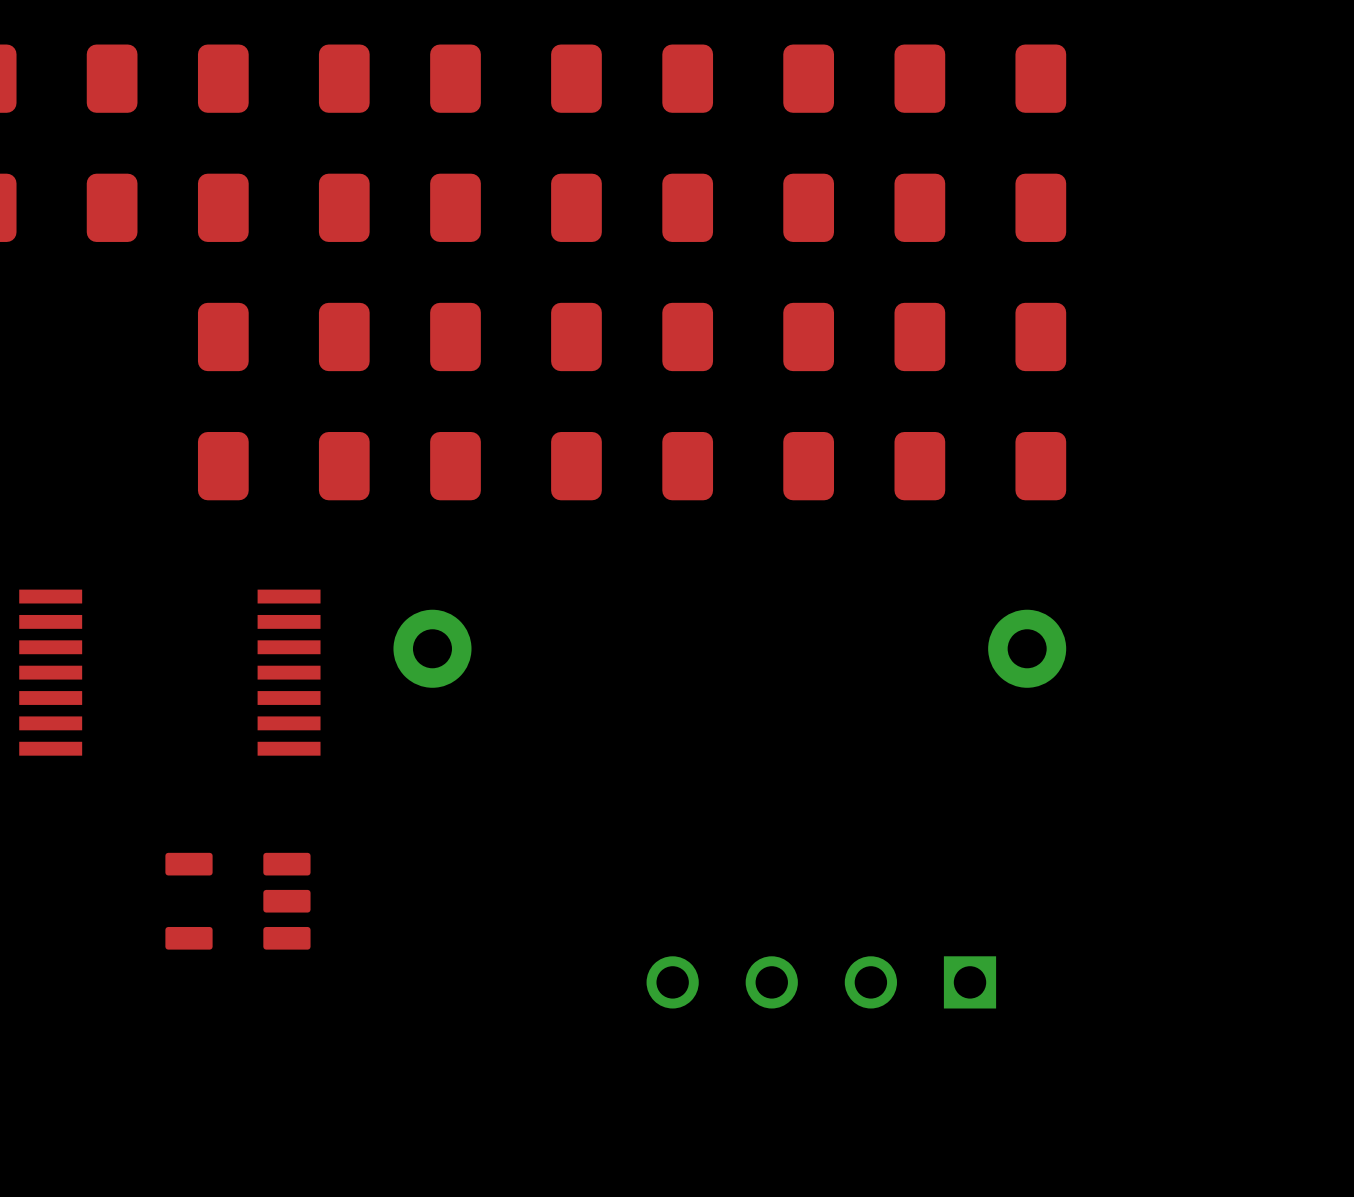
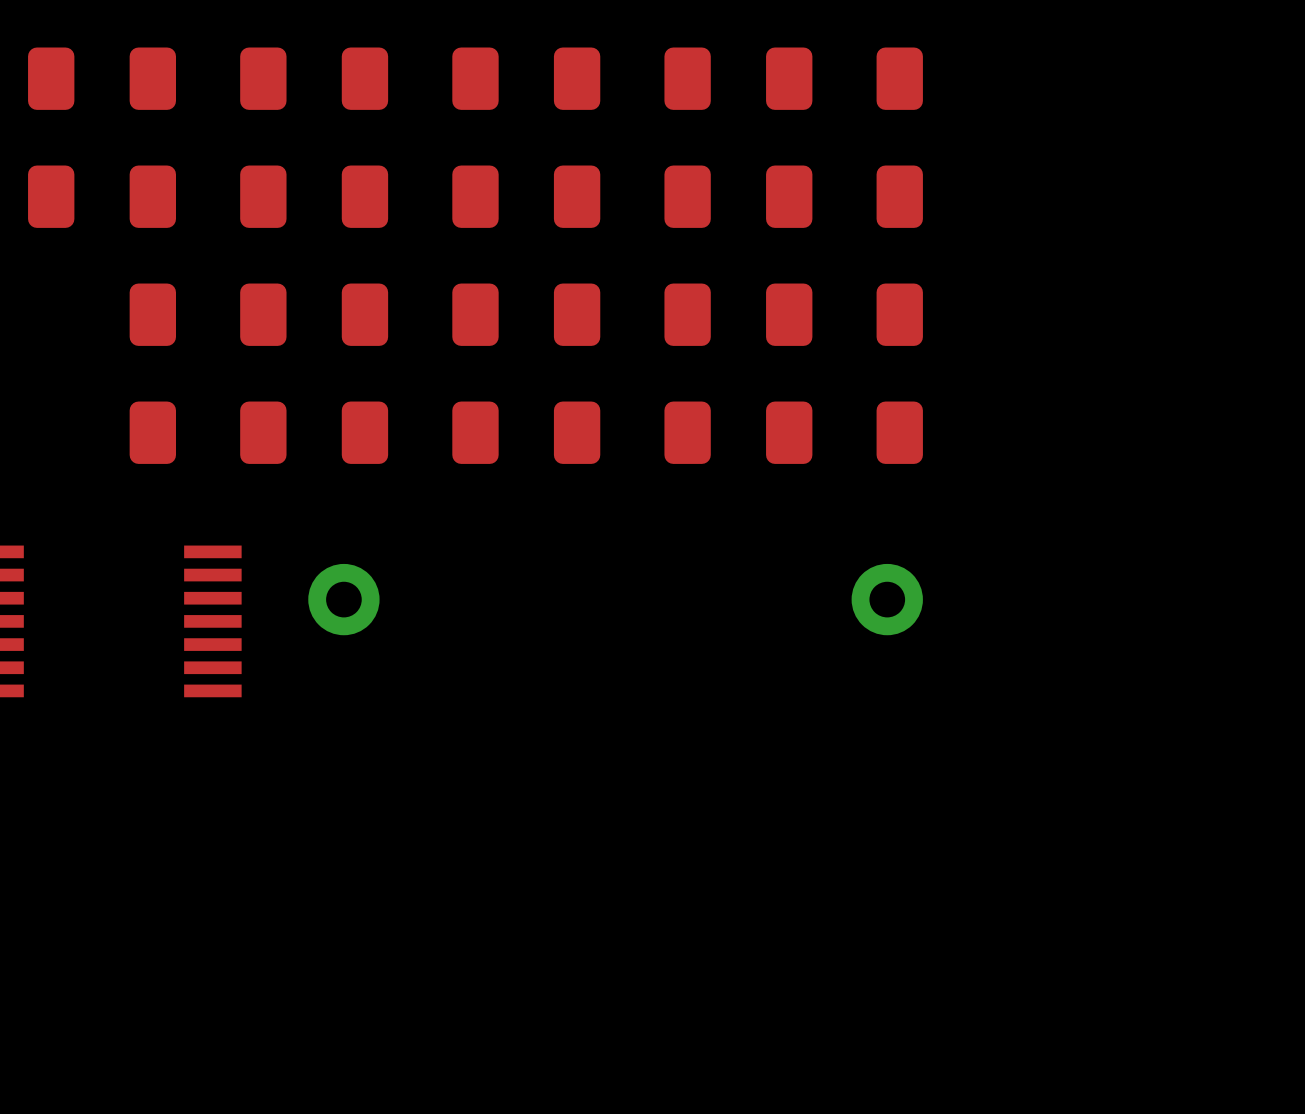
part: (237, 901) -> none
part: (821, 982) -> none

